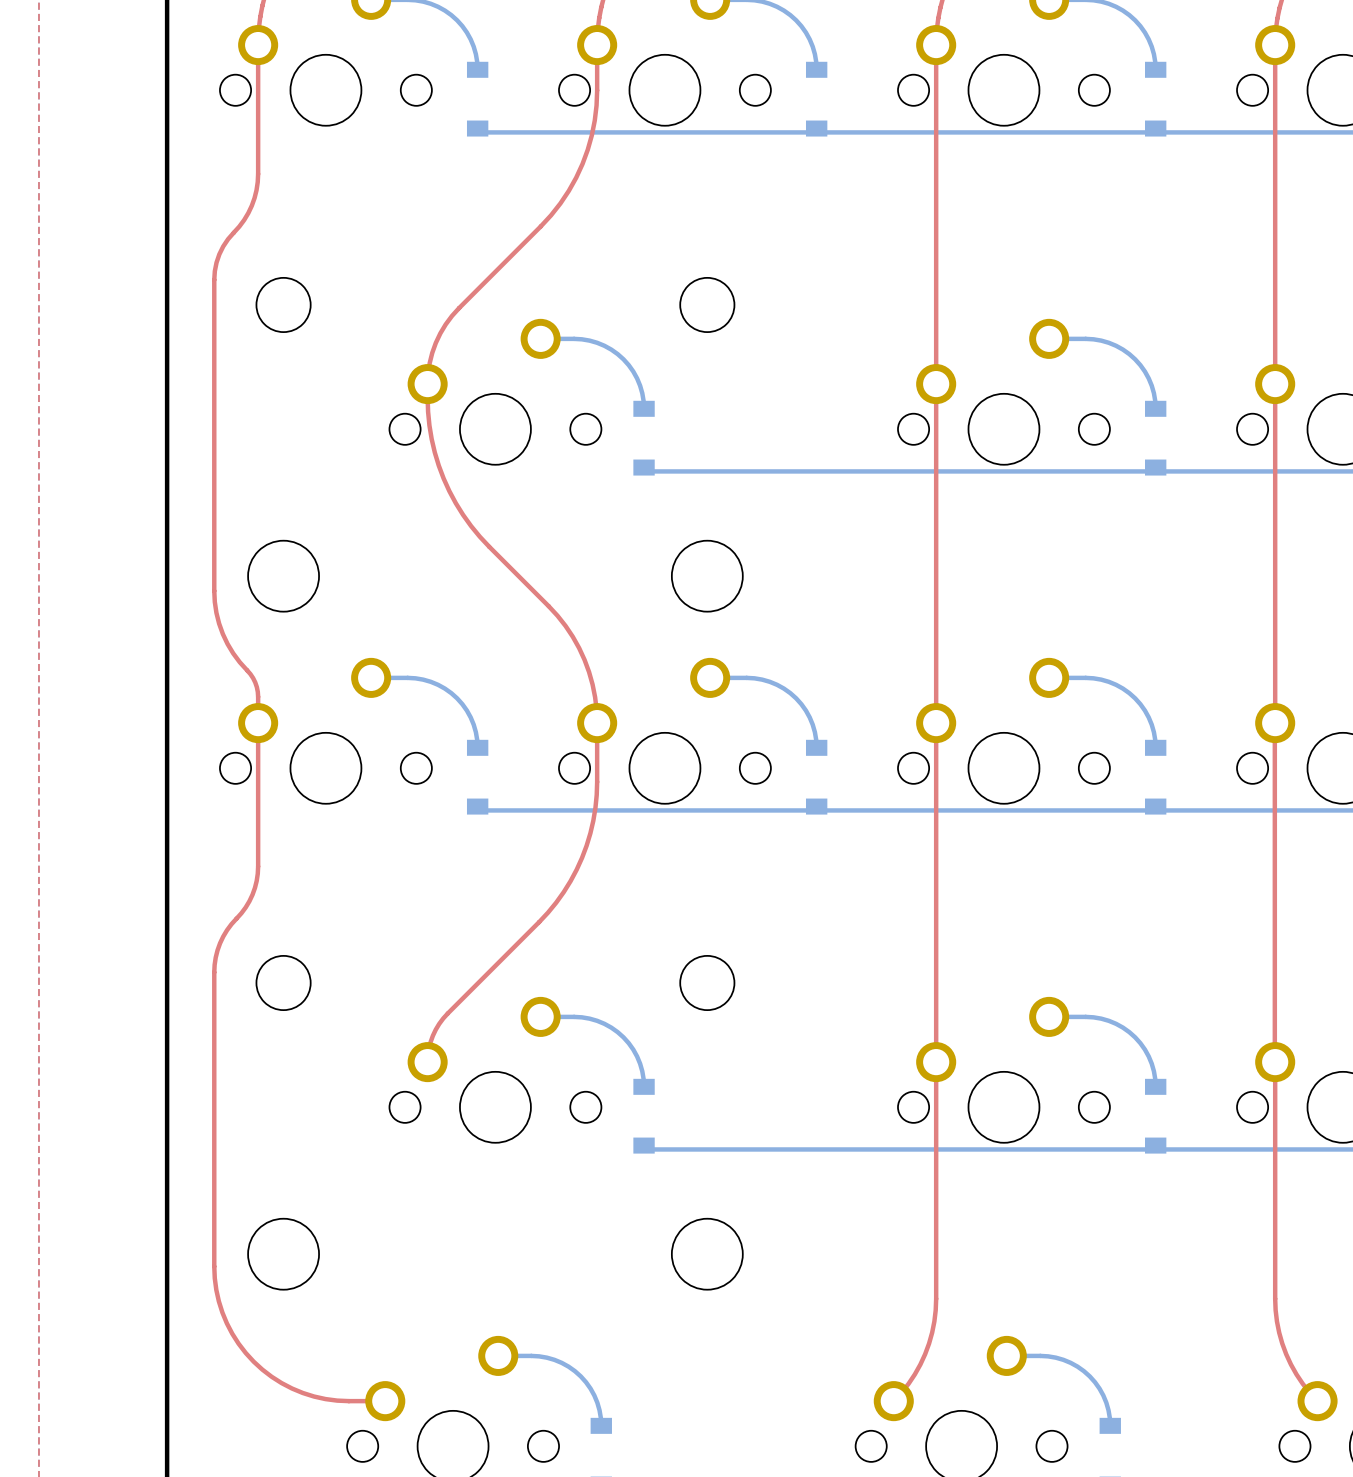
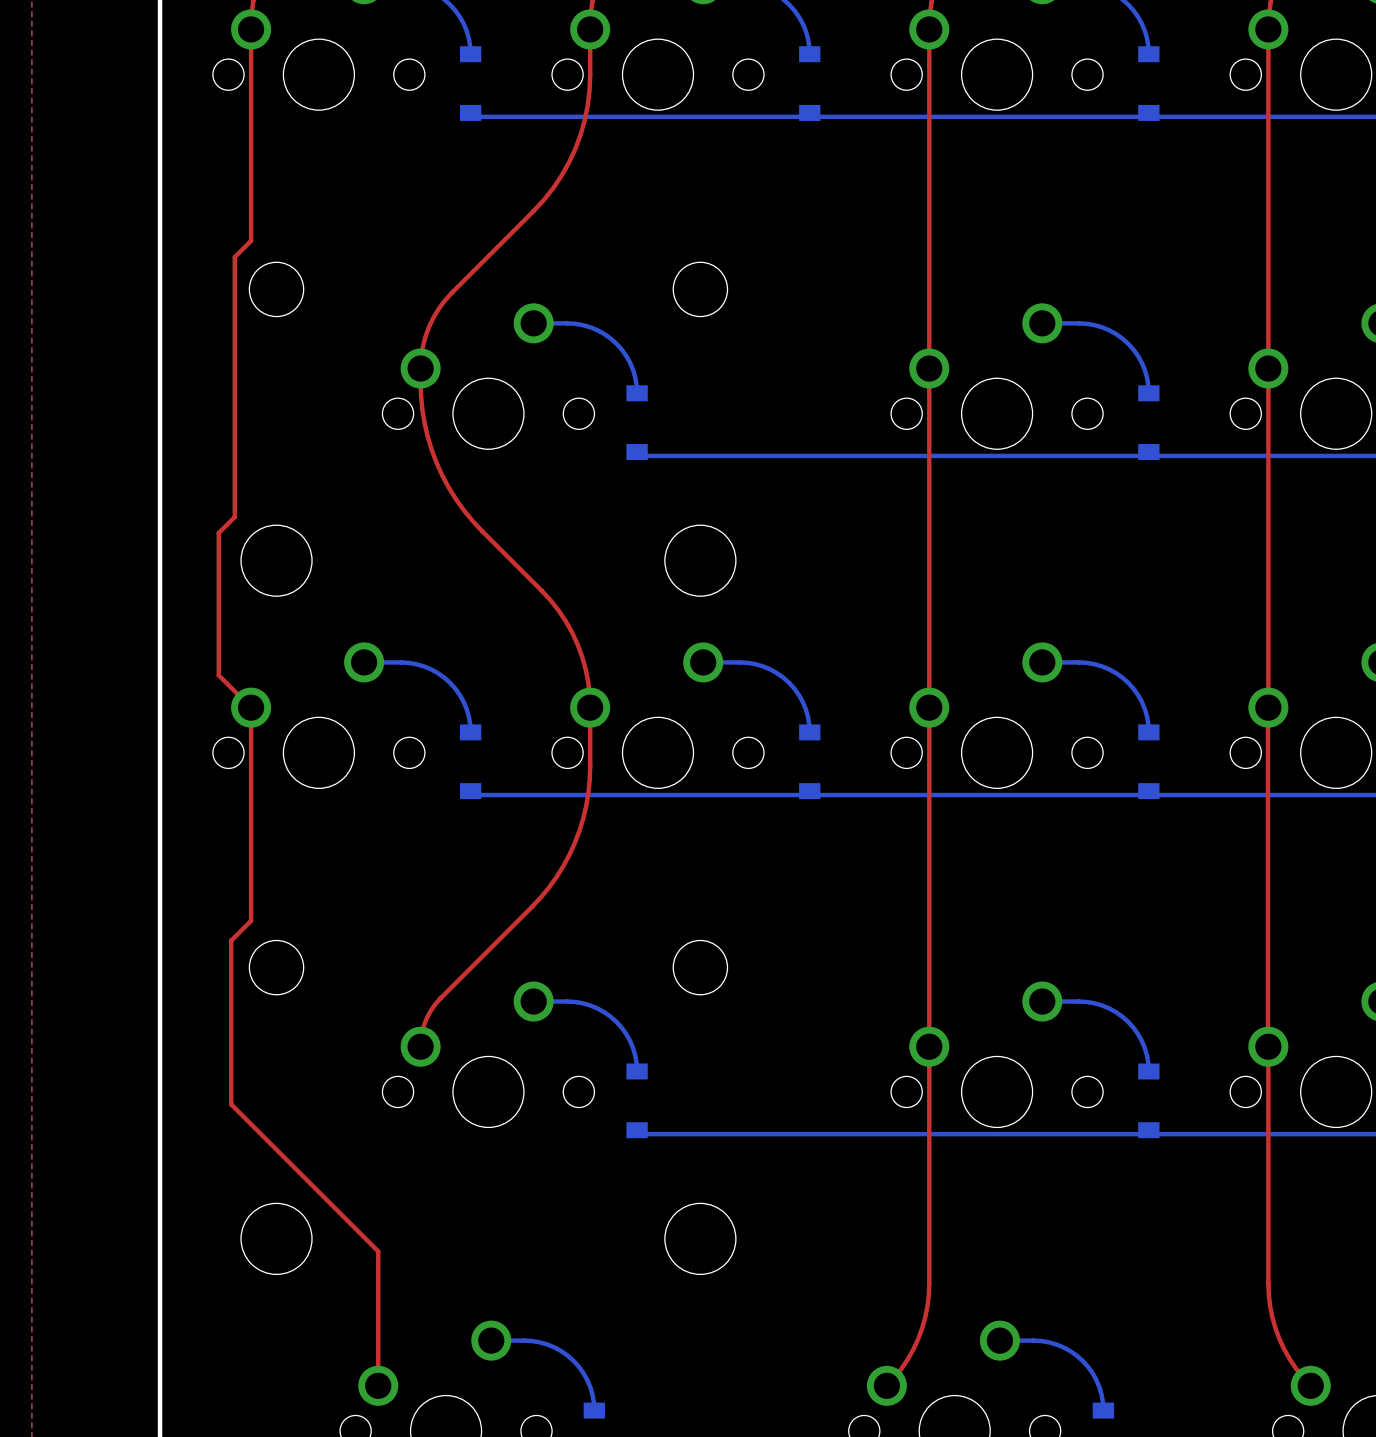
top track: (258, 173) (256, 190) (251, 205) (244, 220) (223, 246) (216, 262) (214, 279) (214, 601) (219, 623) (227, 643) (255, 682) (257, 691) (258, 723) -> (251, 158) (251, 240) (234, 257) (234, 517) (218, 533) (218, 675) (251, 707)
top track: (258, 866) (252, 894) (245, 907) (223, 936) (214, 964) (214, 1266) (218, 1301) (226, 1323) (238, 1343) (253, 1361) (281, 1383) (302, 1393) (325, 1399) (385, 1401) -> (251, 851) (251, 920) (231, 940) (231, 1104) (378, 1251) (378, 1385)

